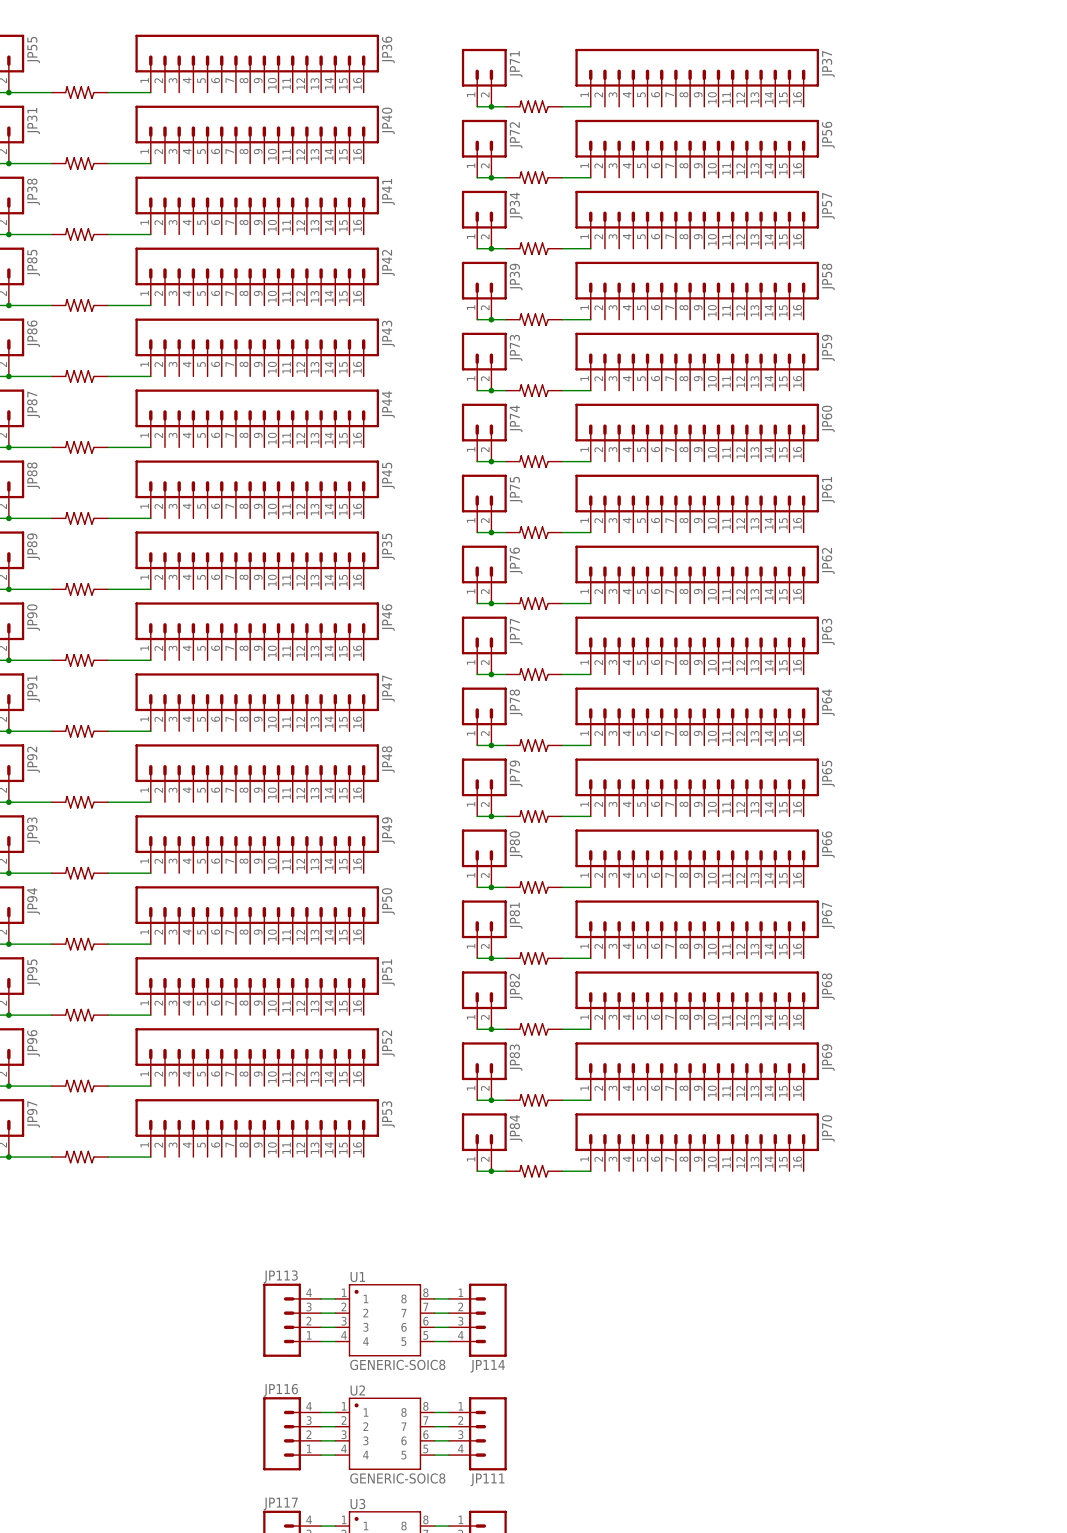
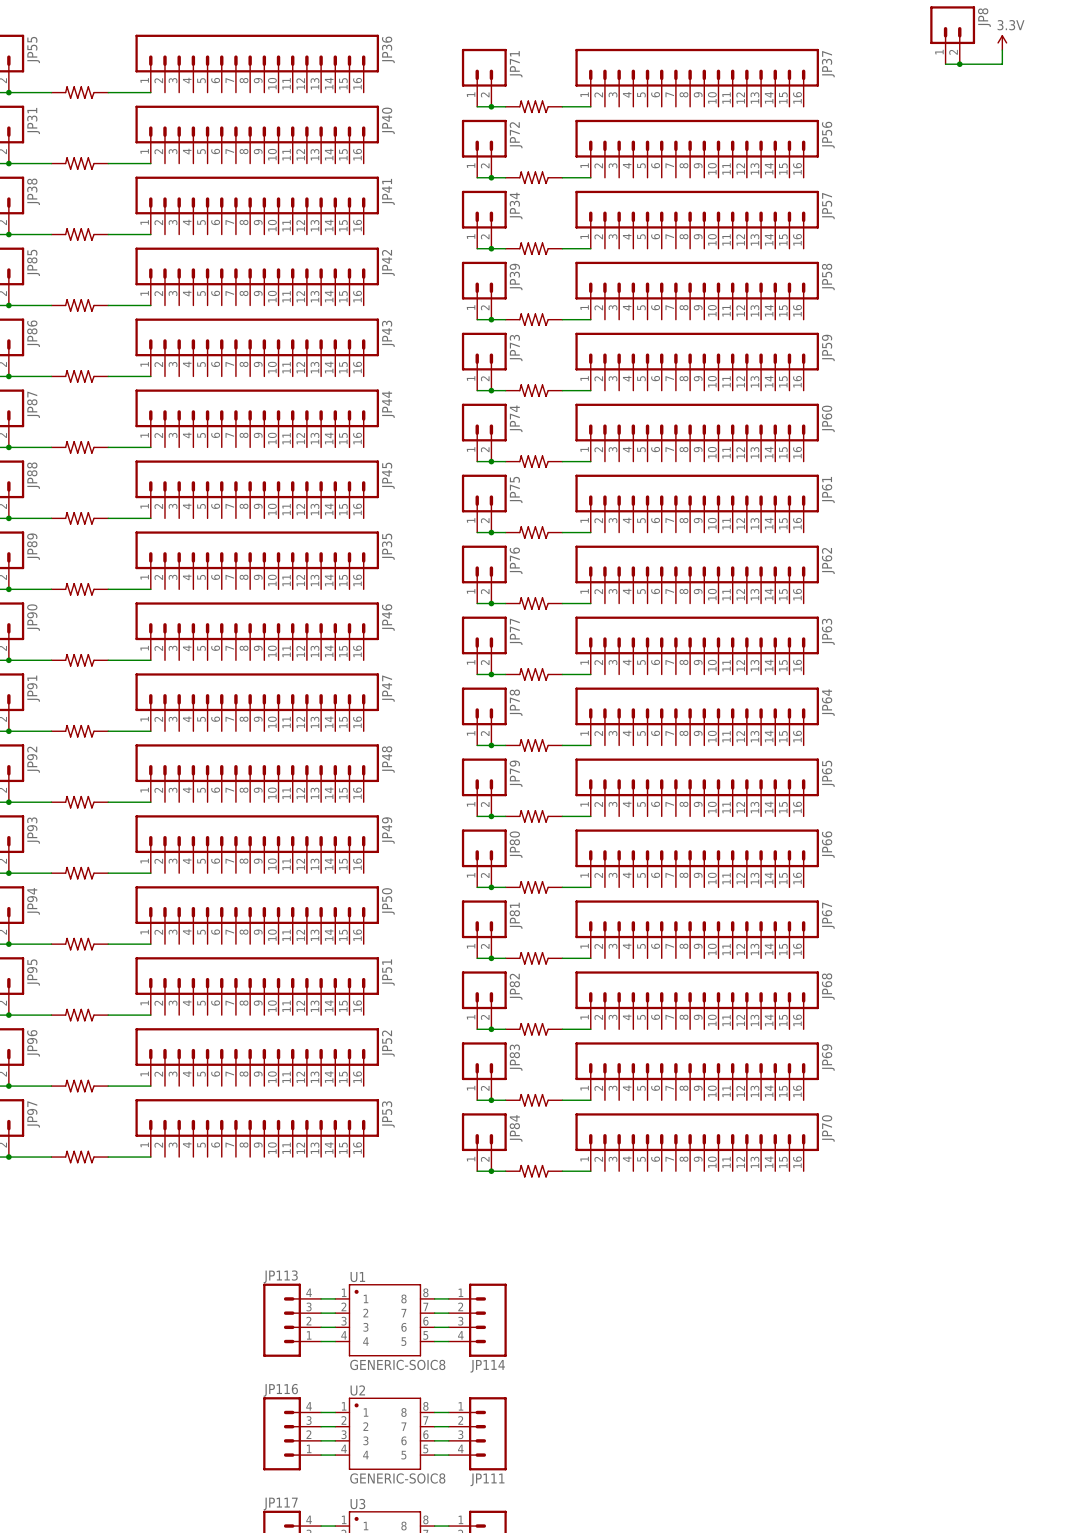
JP8: none -> (952, 35)
power symbol: none -> 3.3V (1002, 42)
wire: none -> (1002, 50) (1002, 64) (945, 64)
junction: none -> (959, 64)

